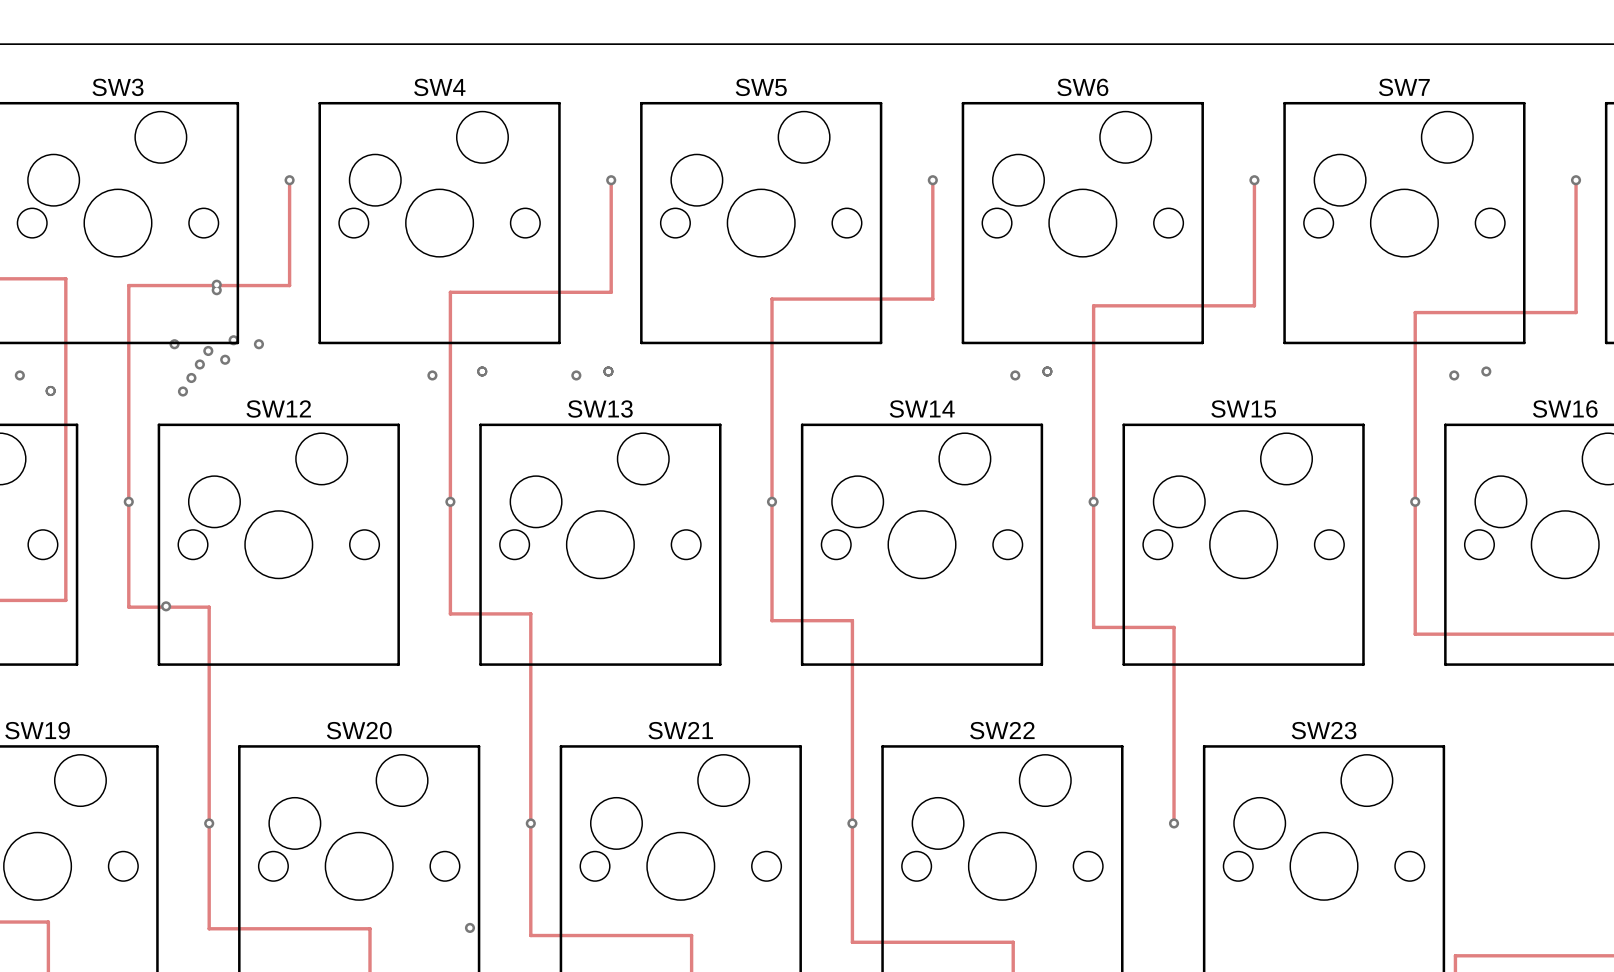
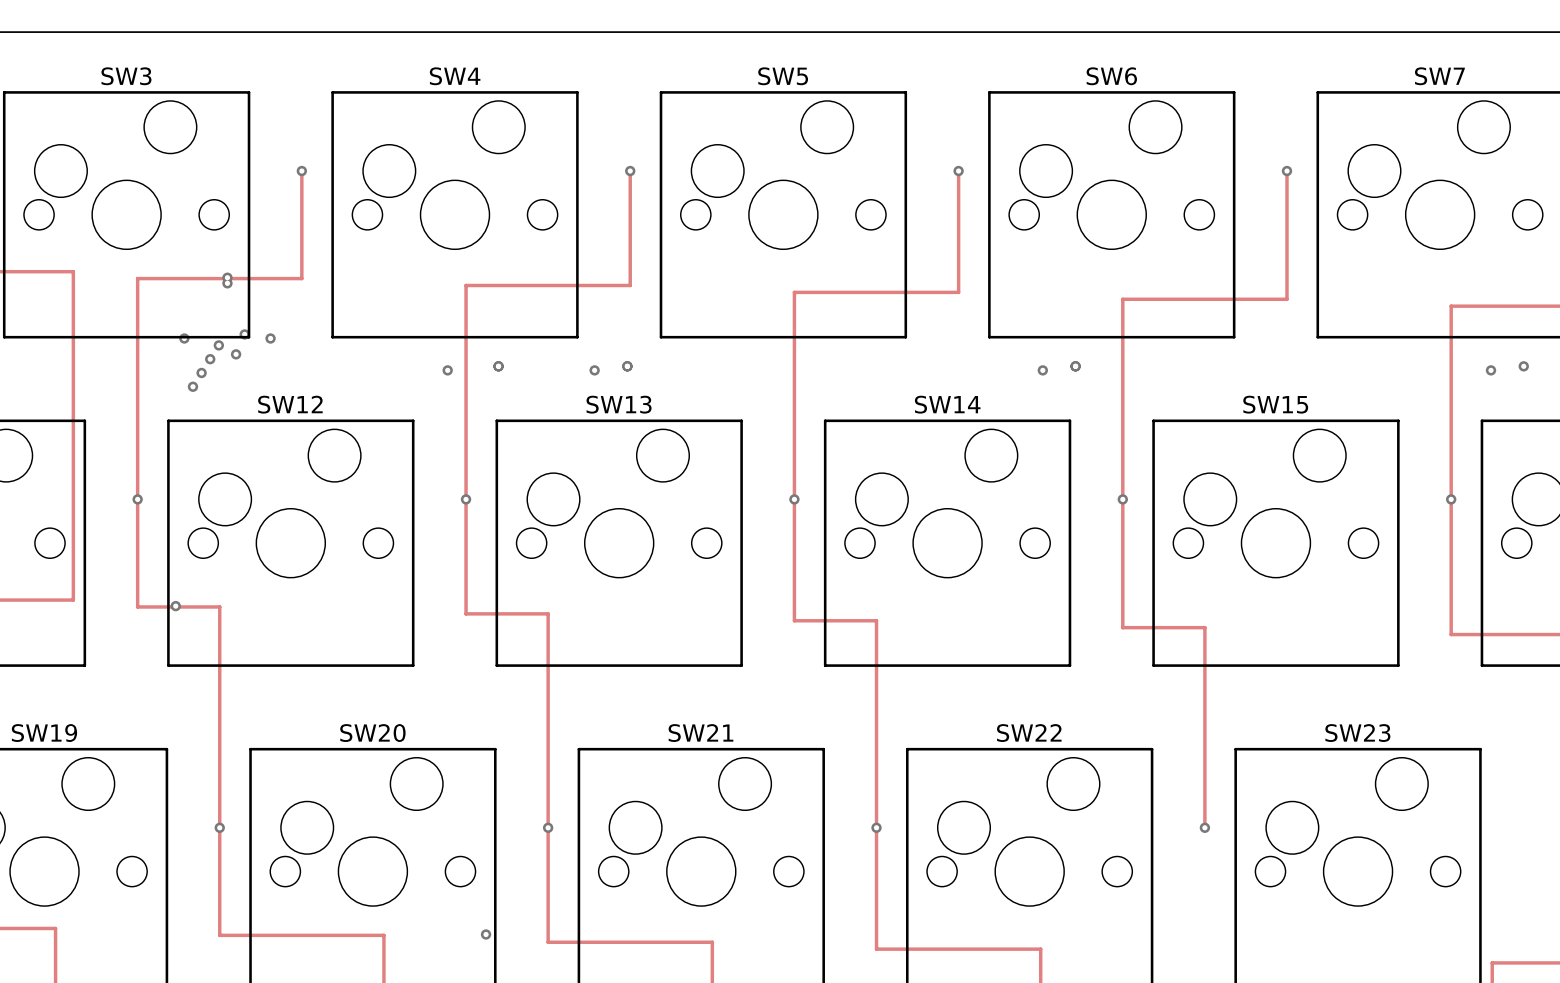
via: (19, 375) -> none
via: (50, 390) -> none

